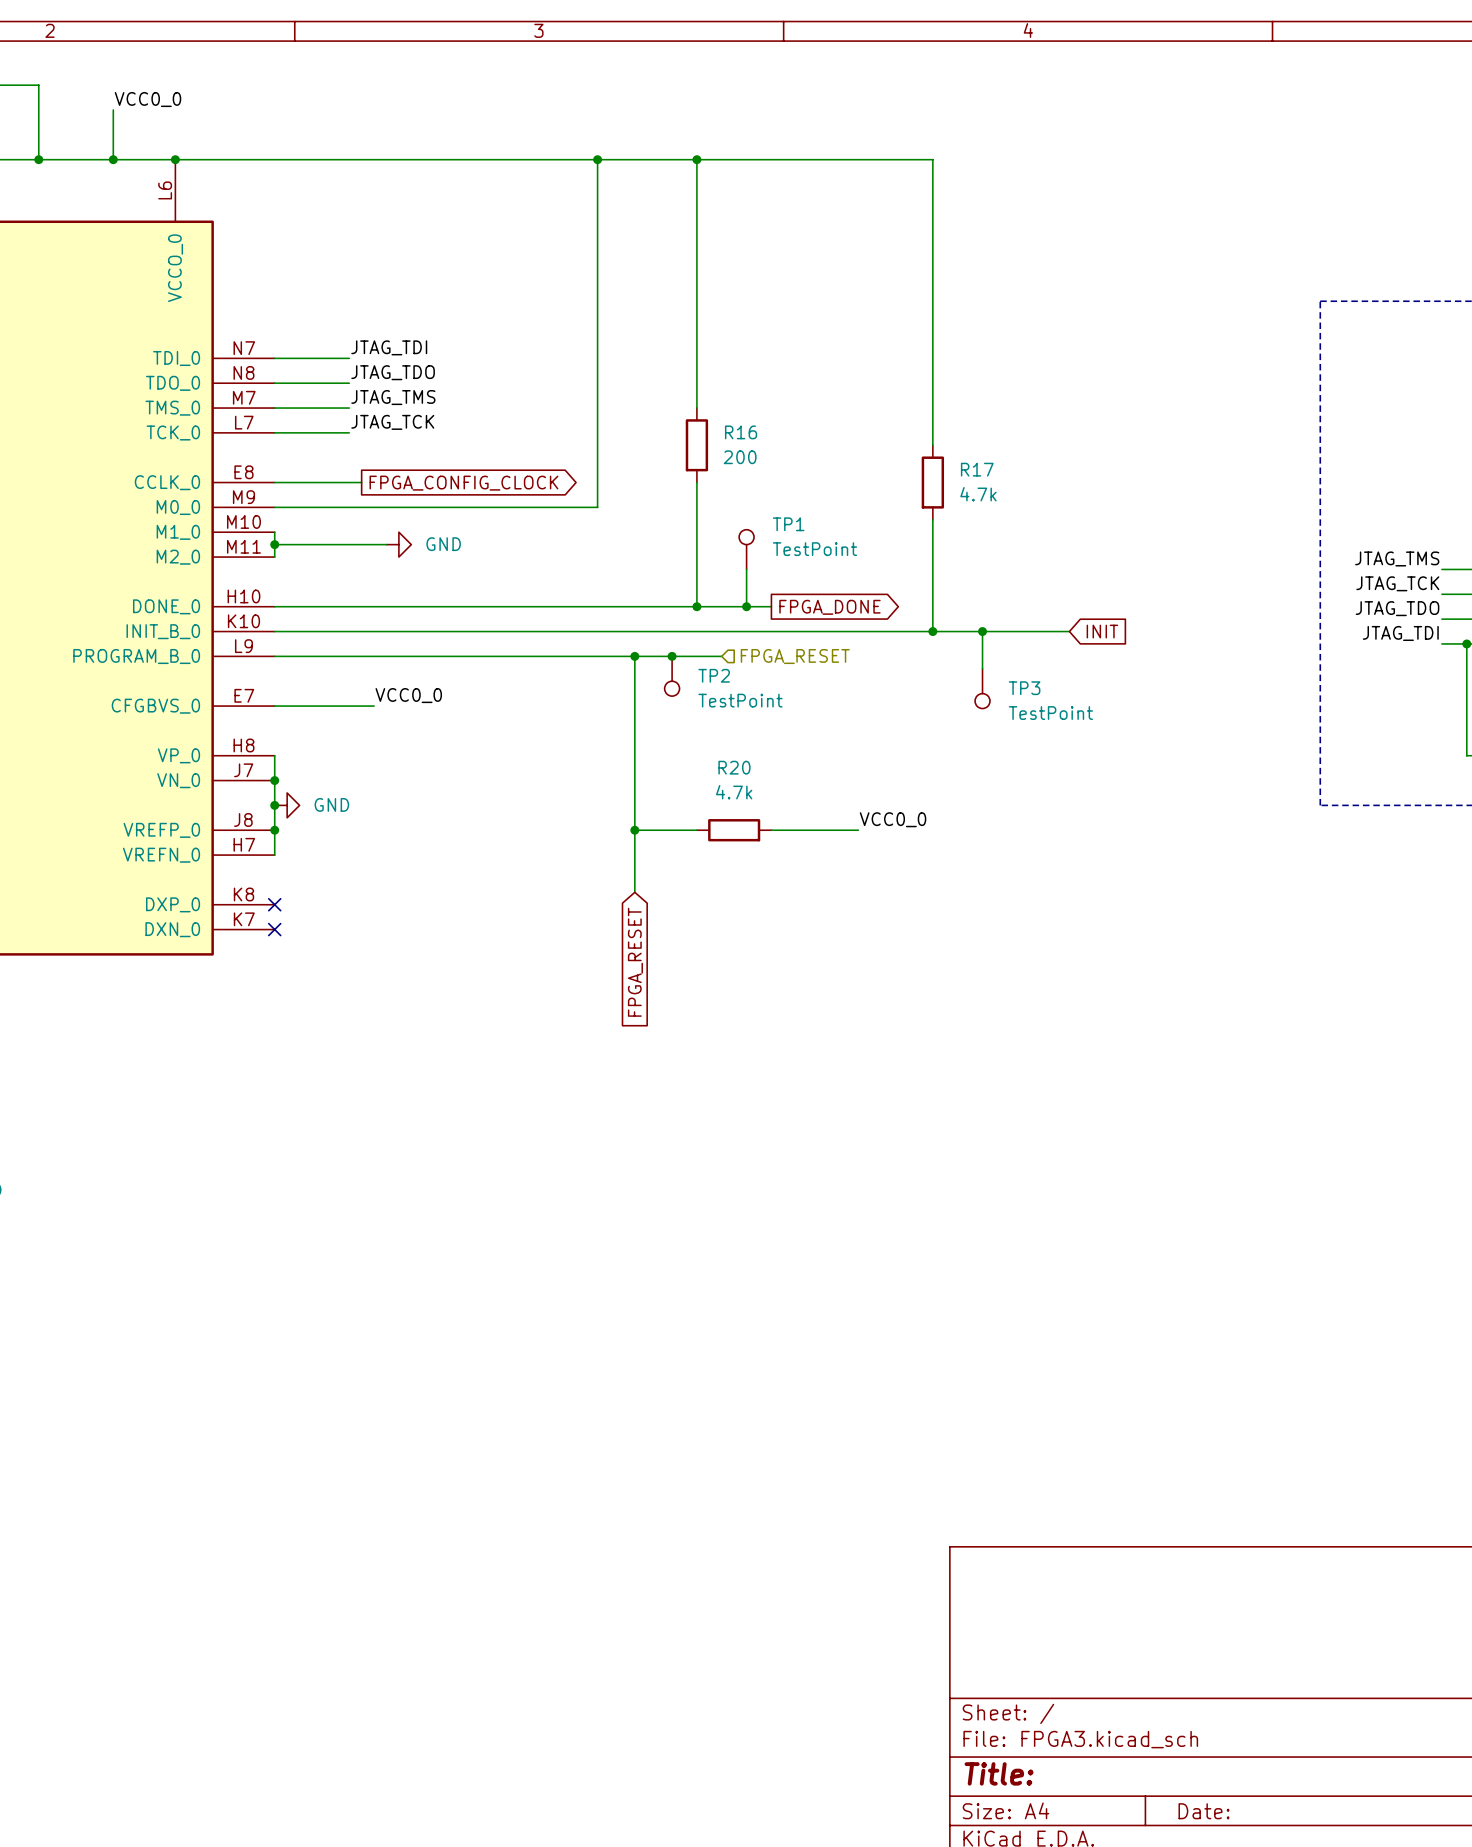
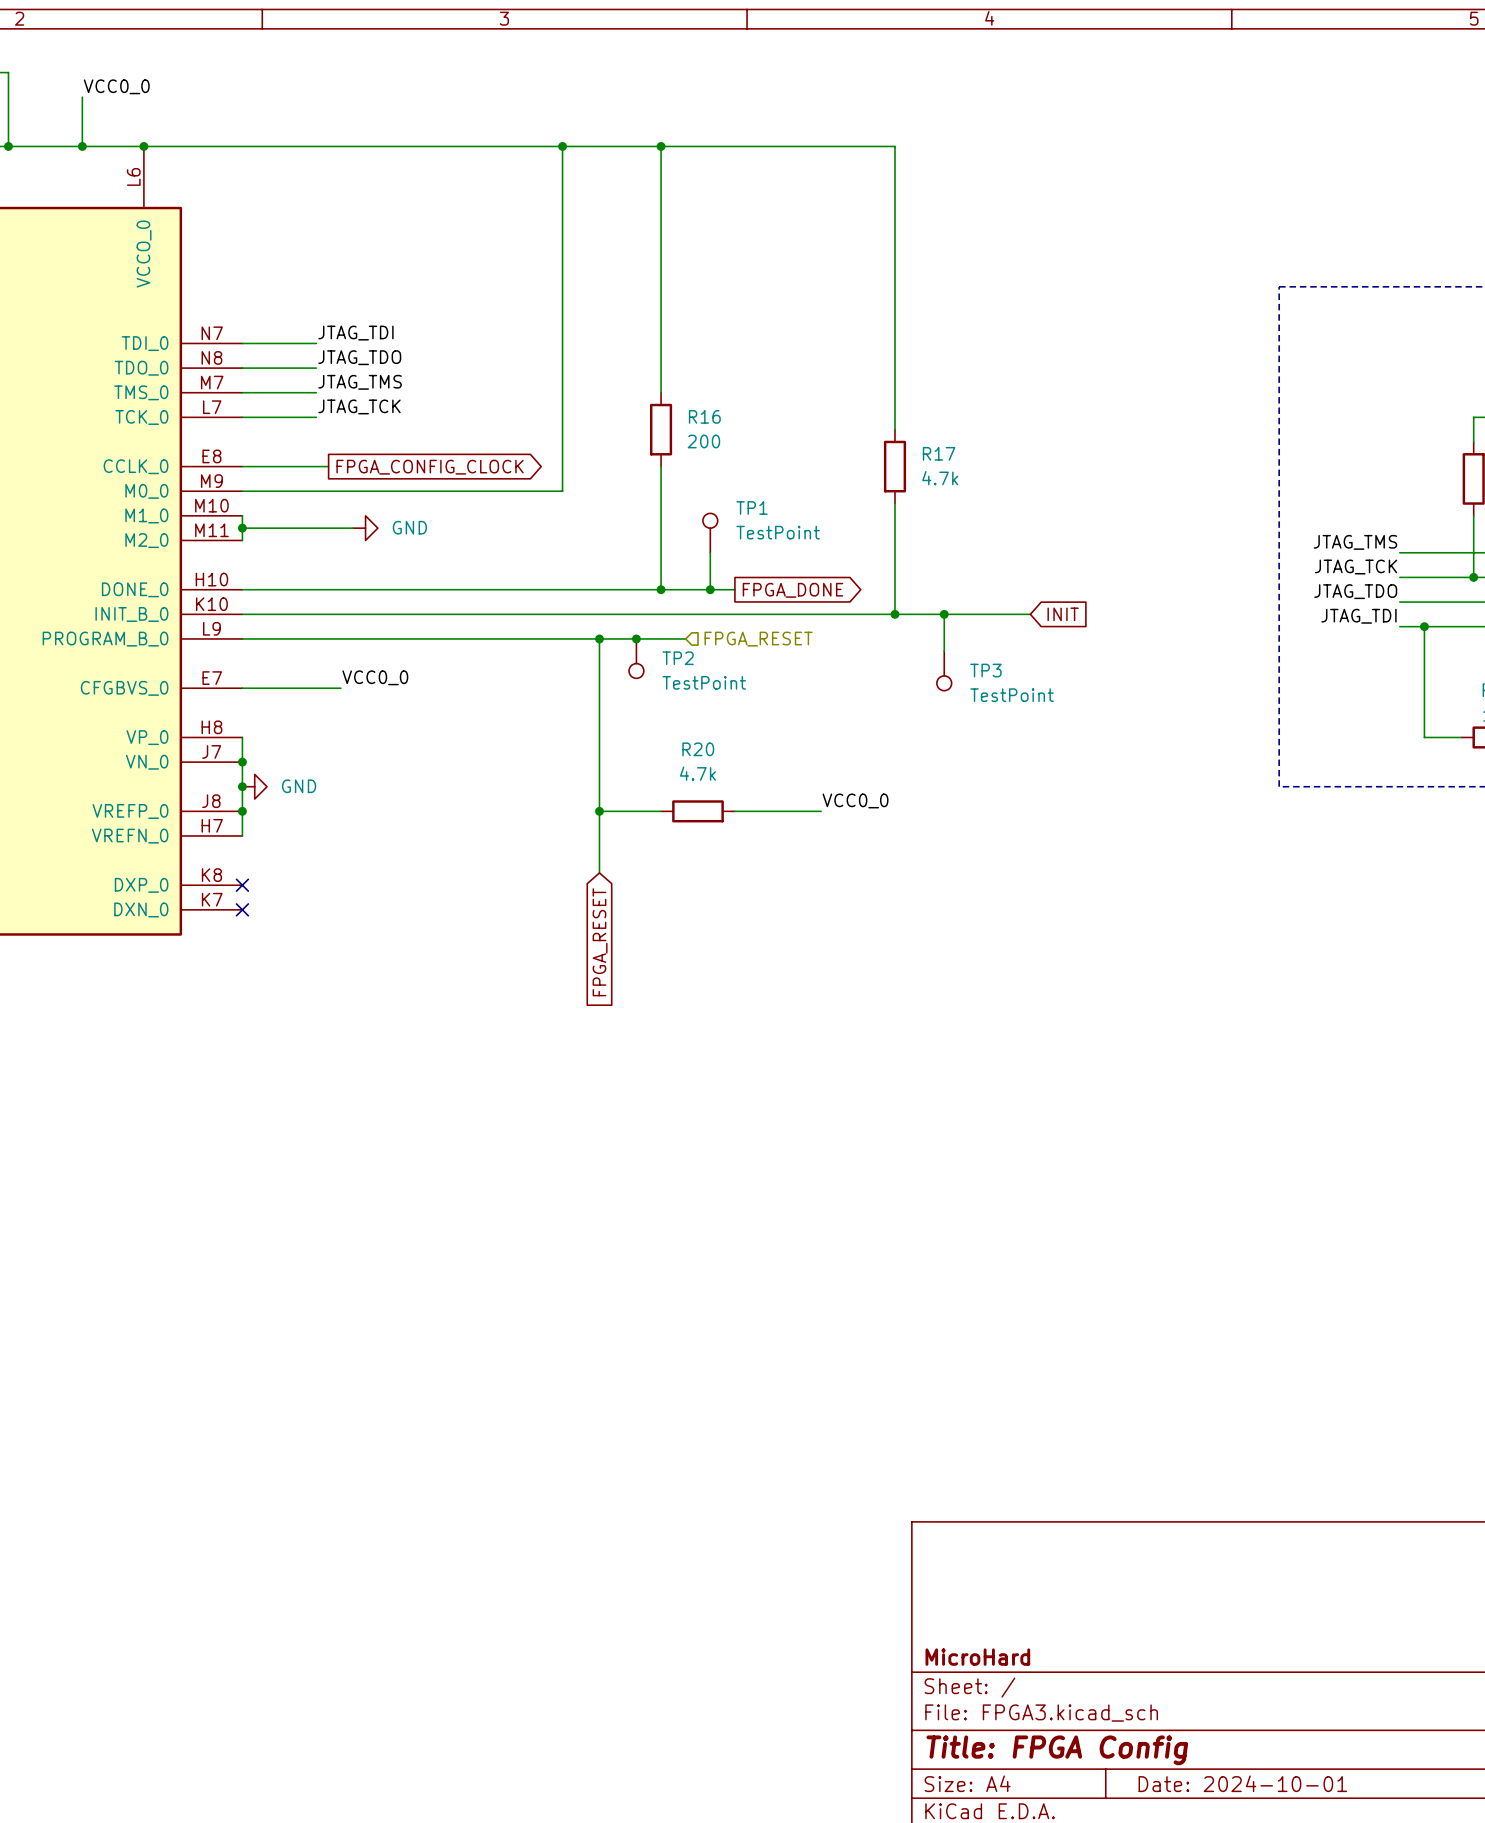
title block: none -> MicroHard (977, 1657)
title block: Title: (999, 1773) -> Title: FPGA Config (1057, 1750)
title block: Date: (1204, 1811) -> Date: 2024-10-01 (1242, 1783)

